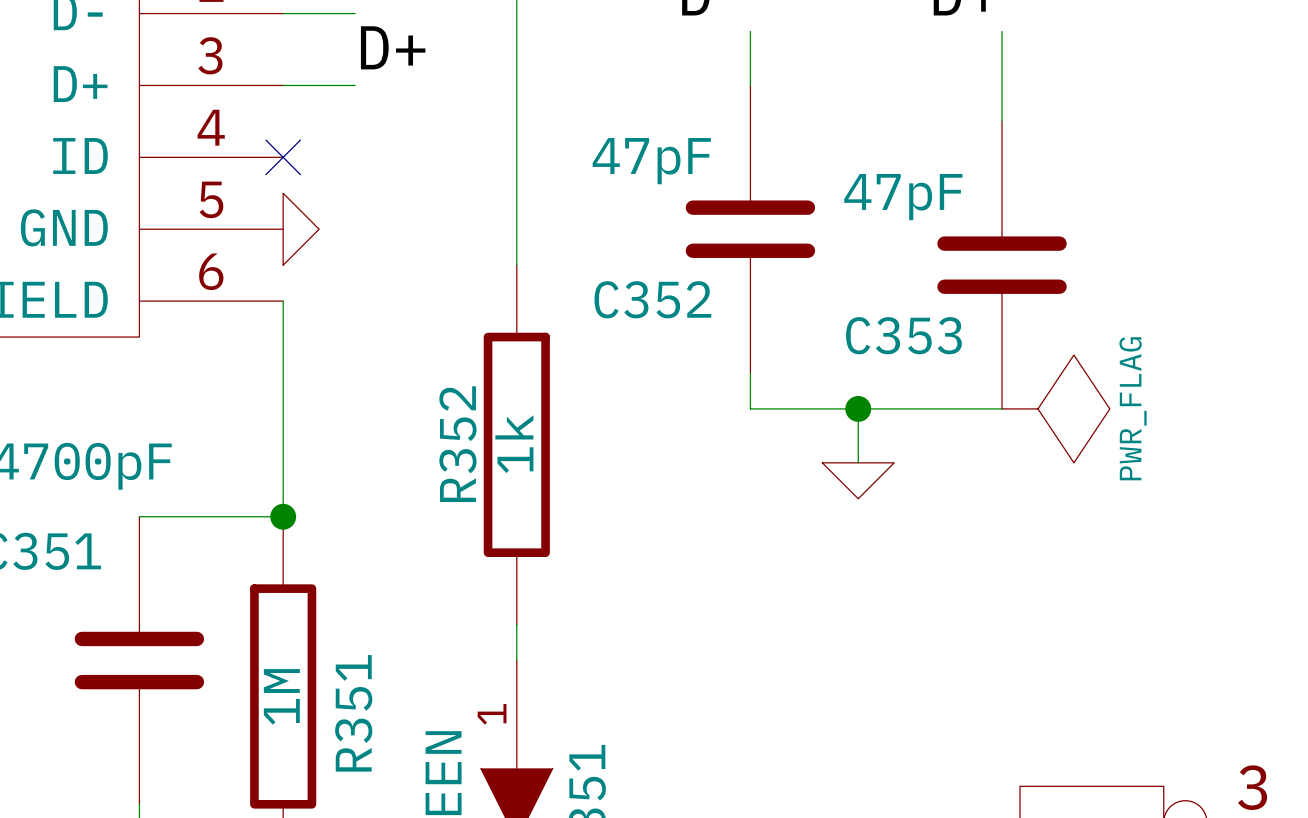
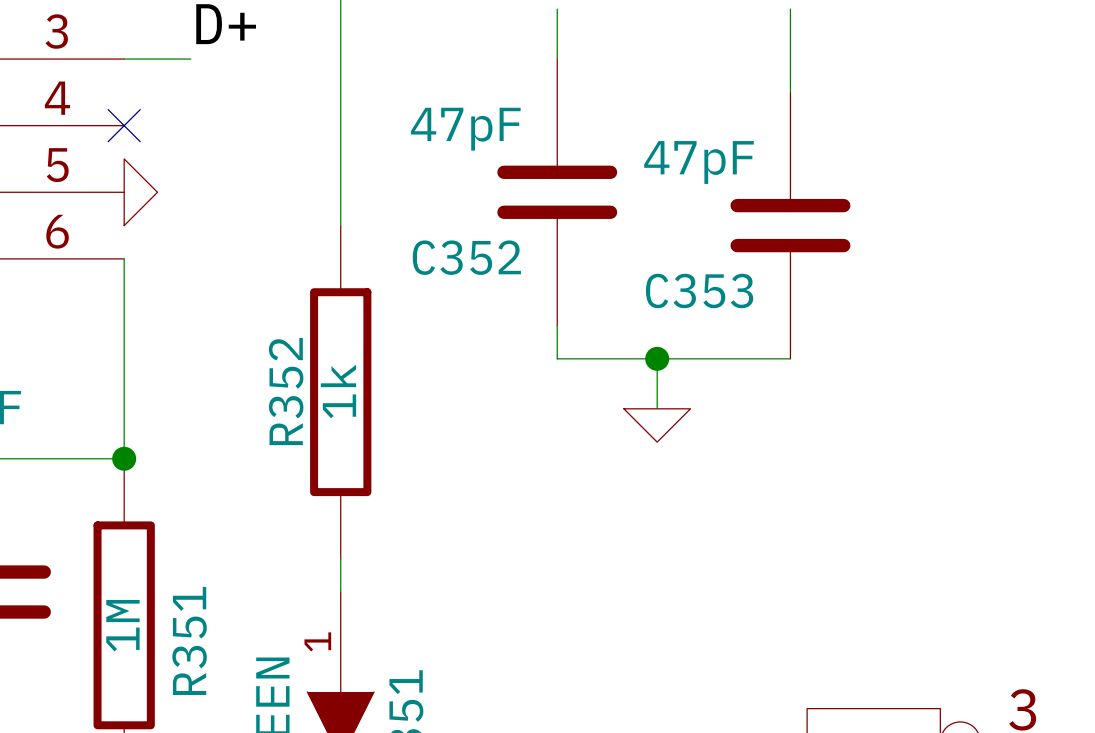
power symbol: PWR_FLAG (1055, 408) -> none

